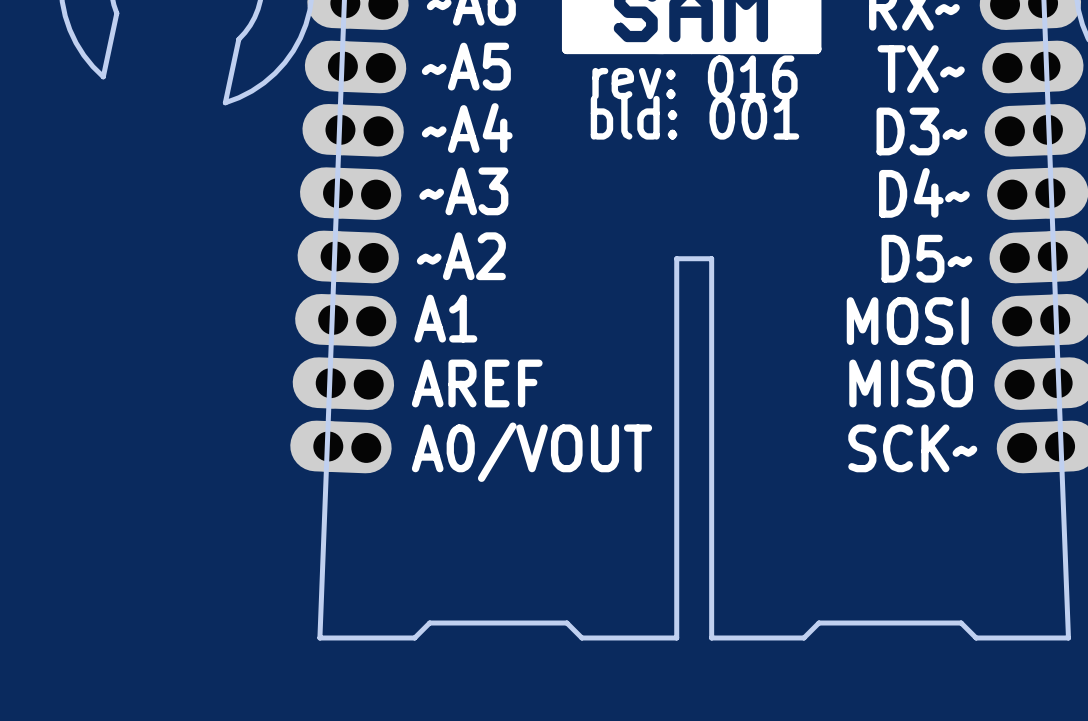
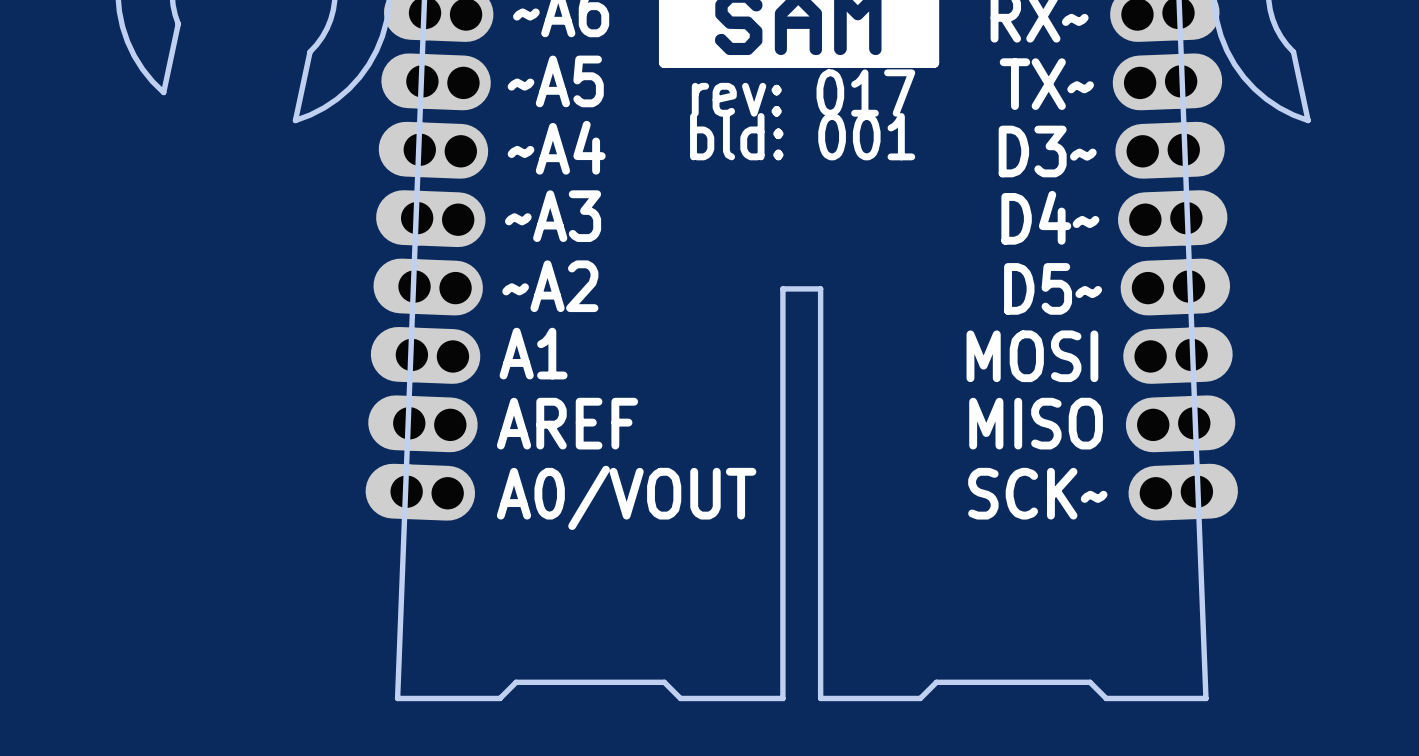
text: rev: 016 (694, 77) -> rev: 017 (803, 93)

